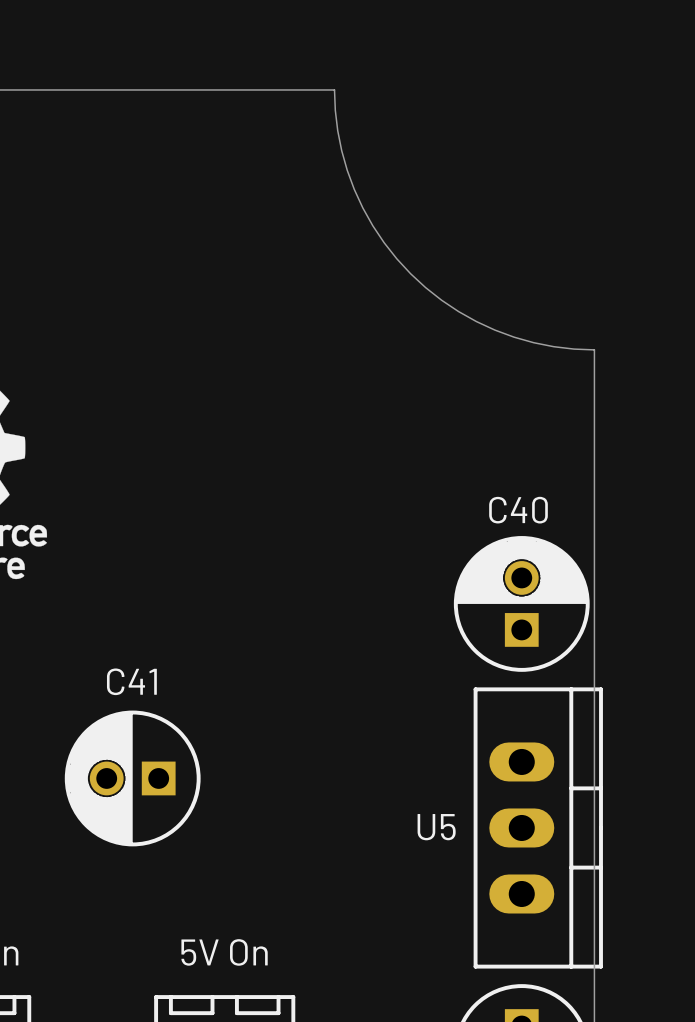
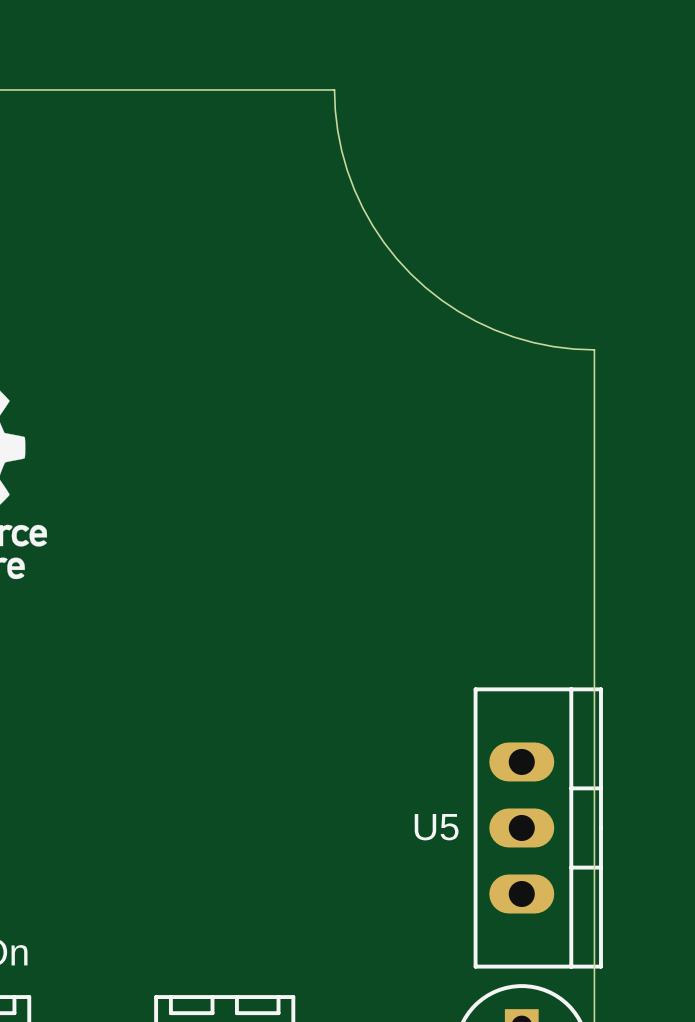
C40: (521, 603) -> none
C41: (132, 778) -> none
text: 5V On (224, 952) -> none

